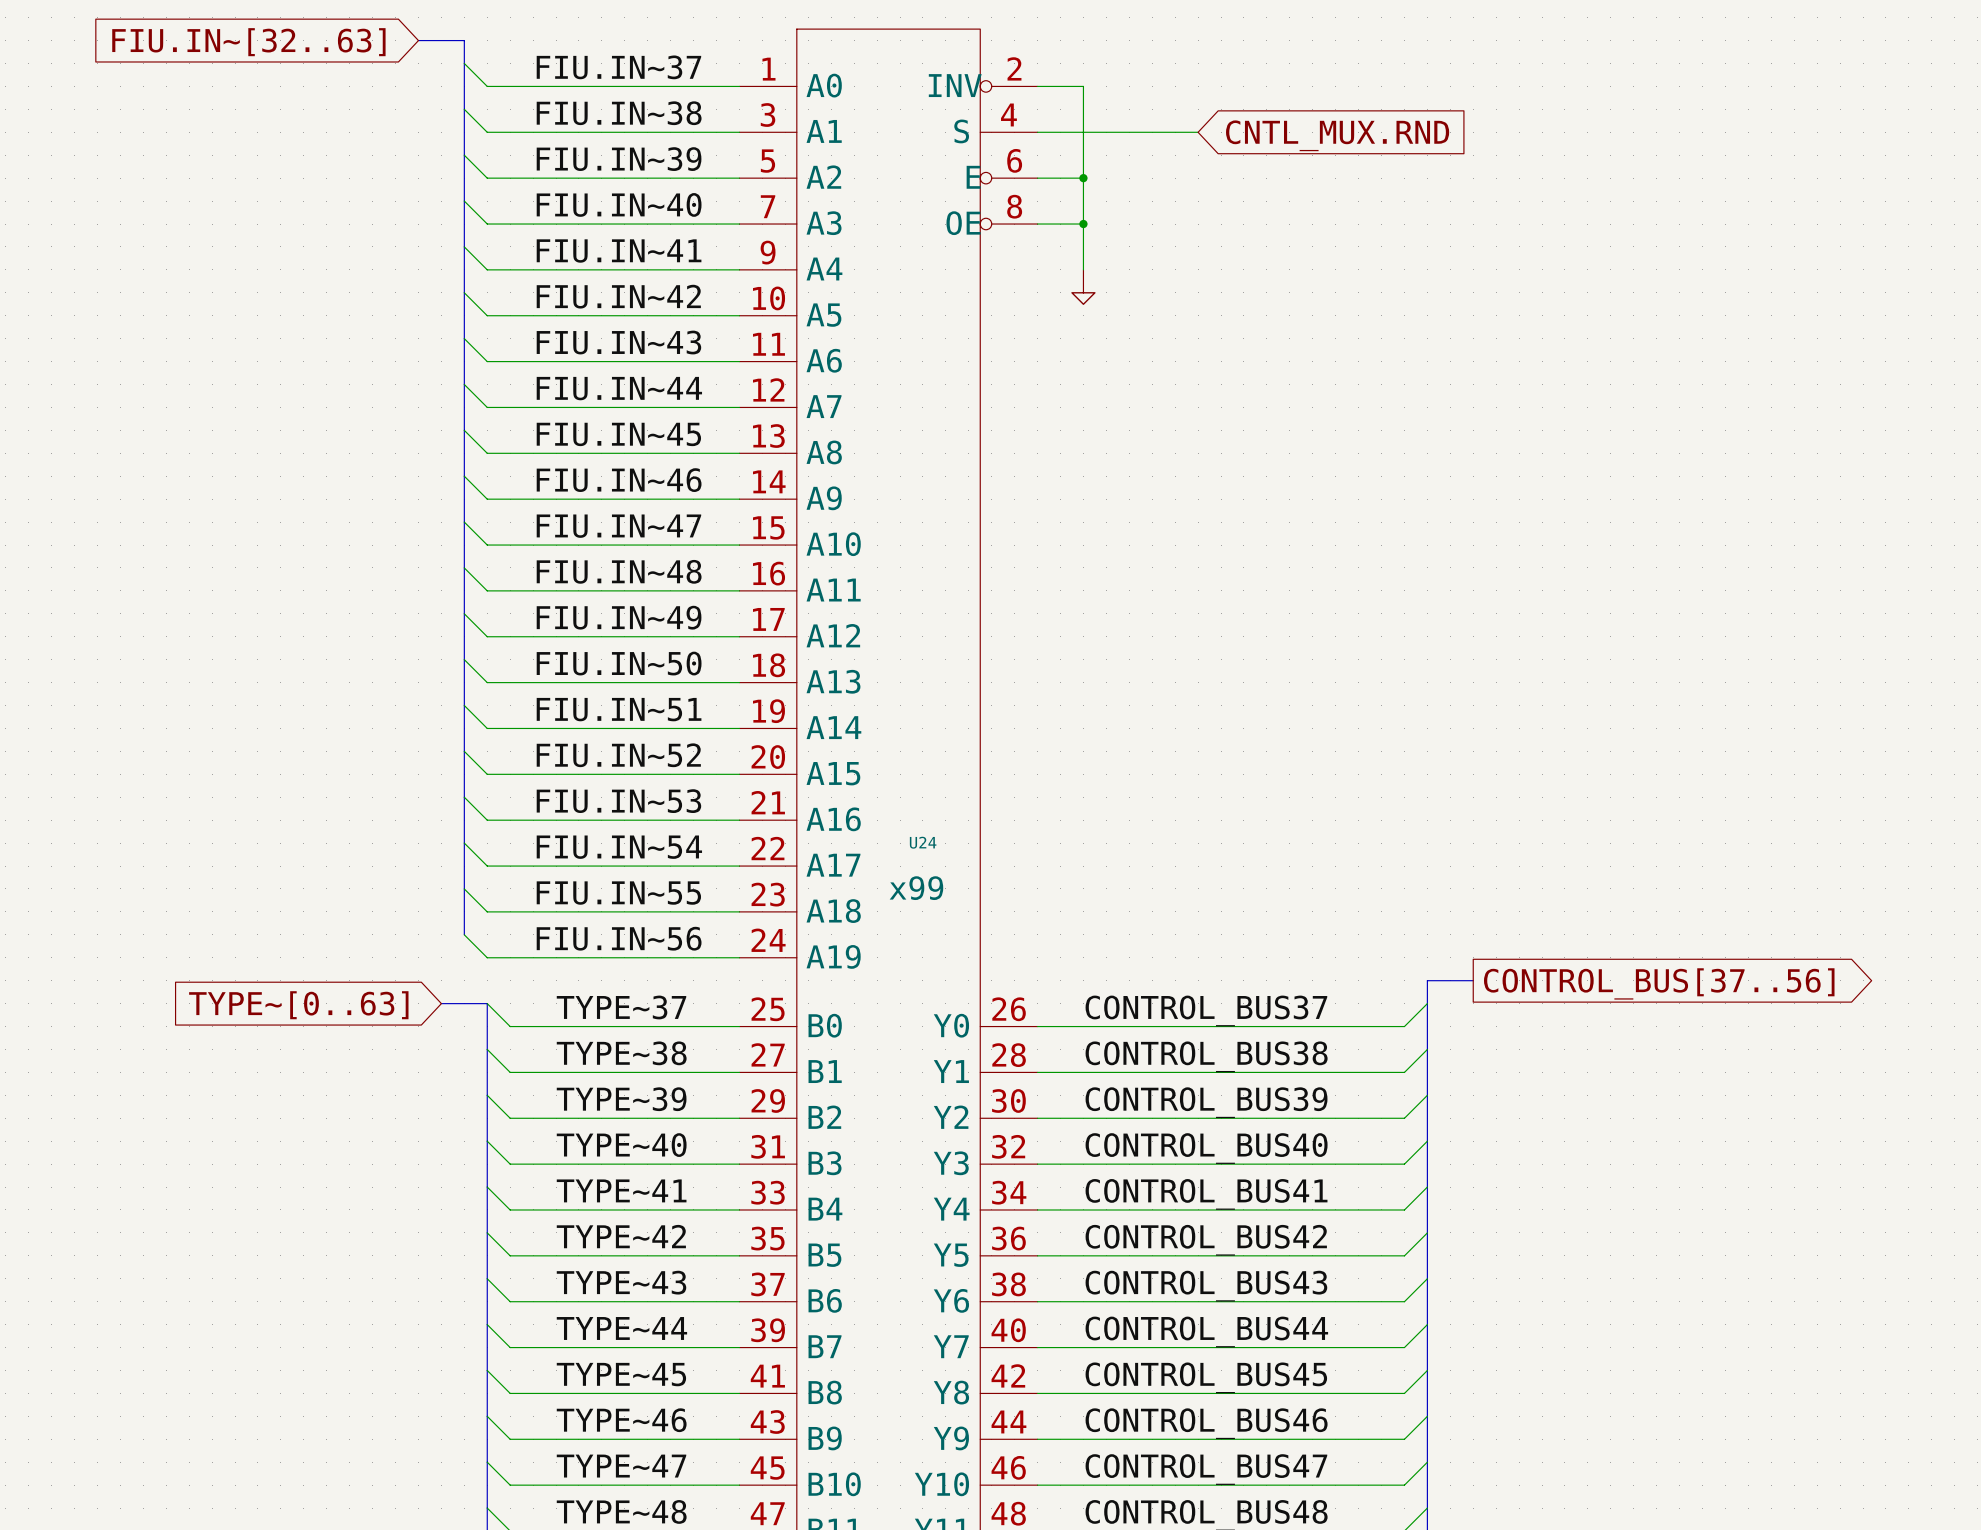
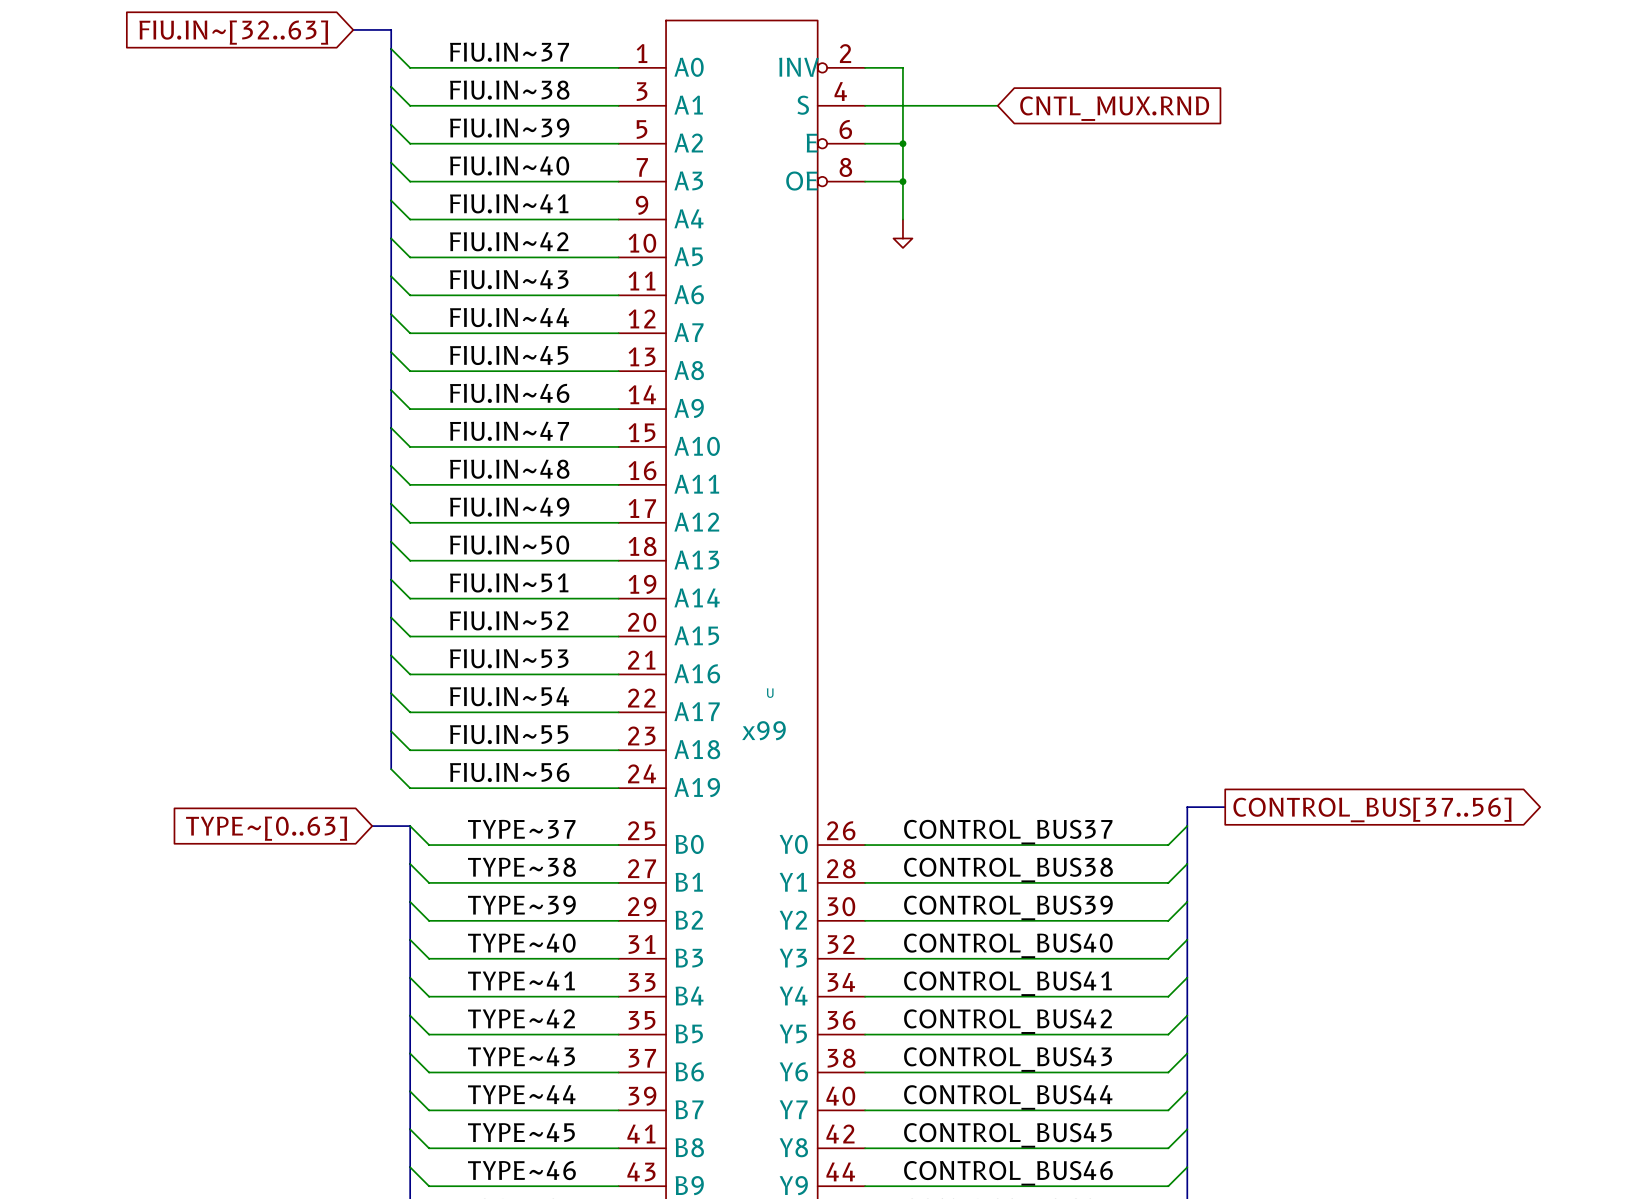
U24 name: U24 (923, 842) -> U (770, 693)

